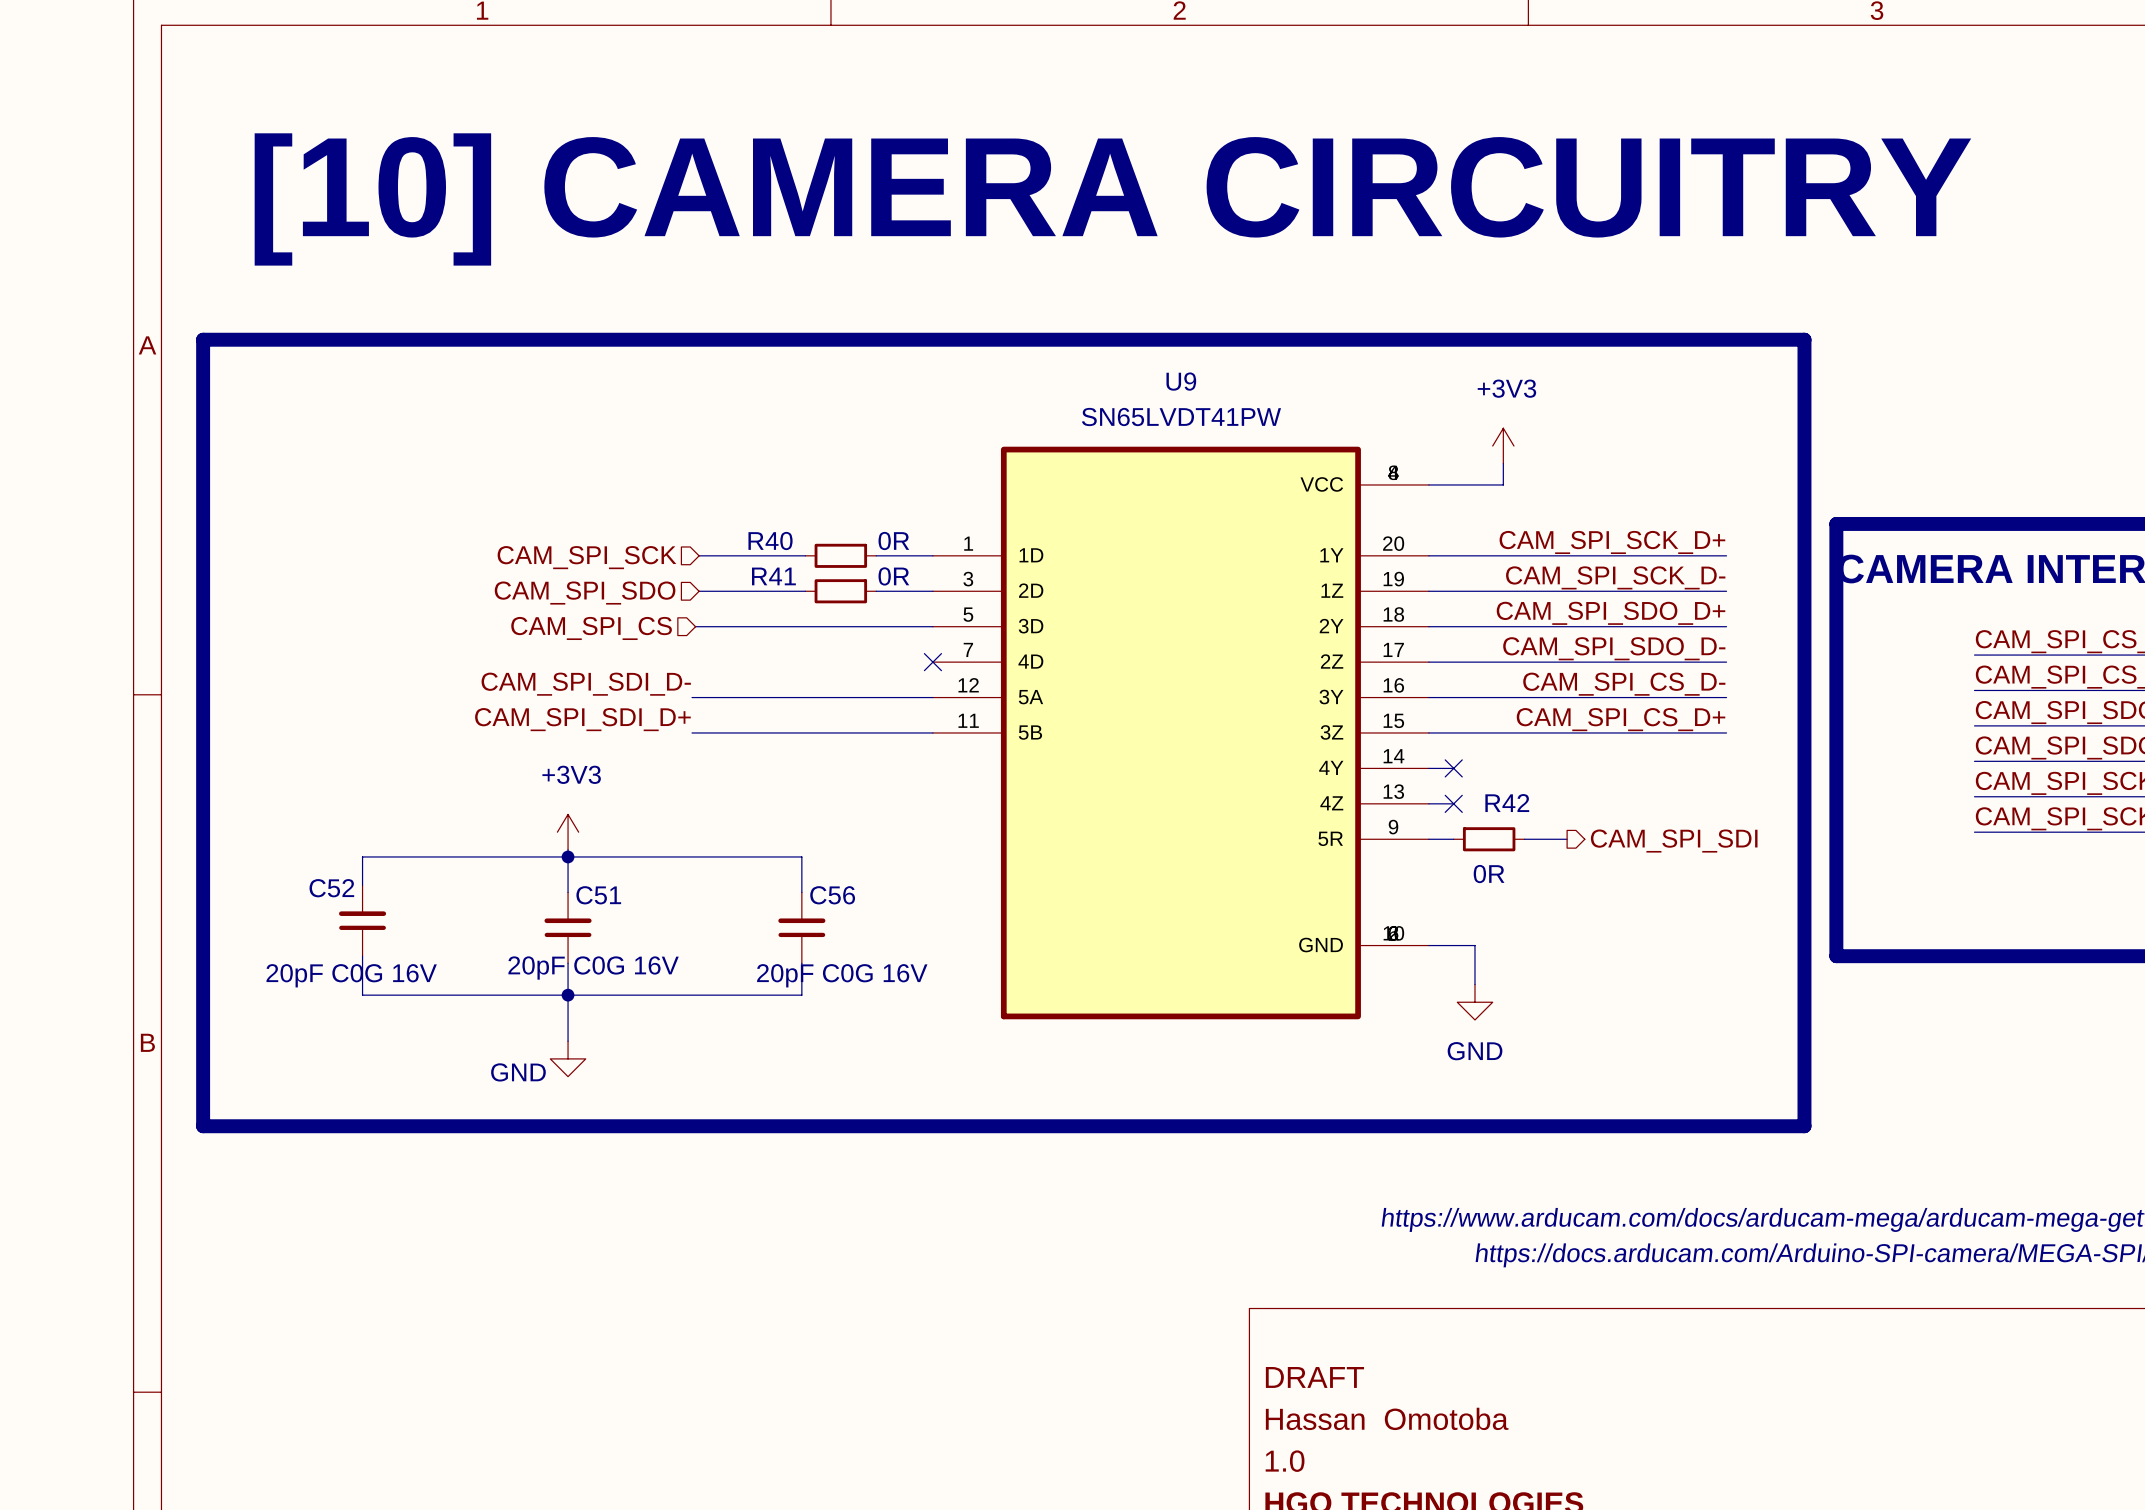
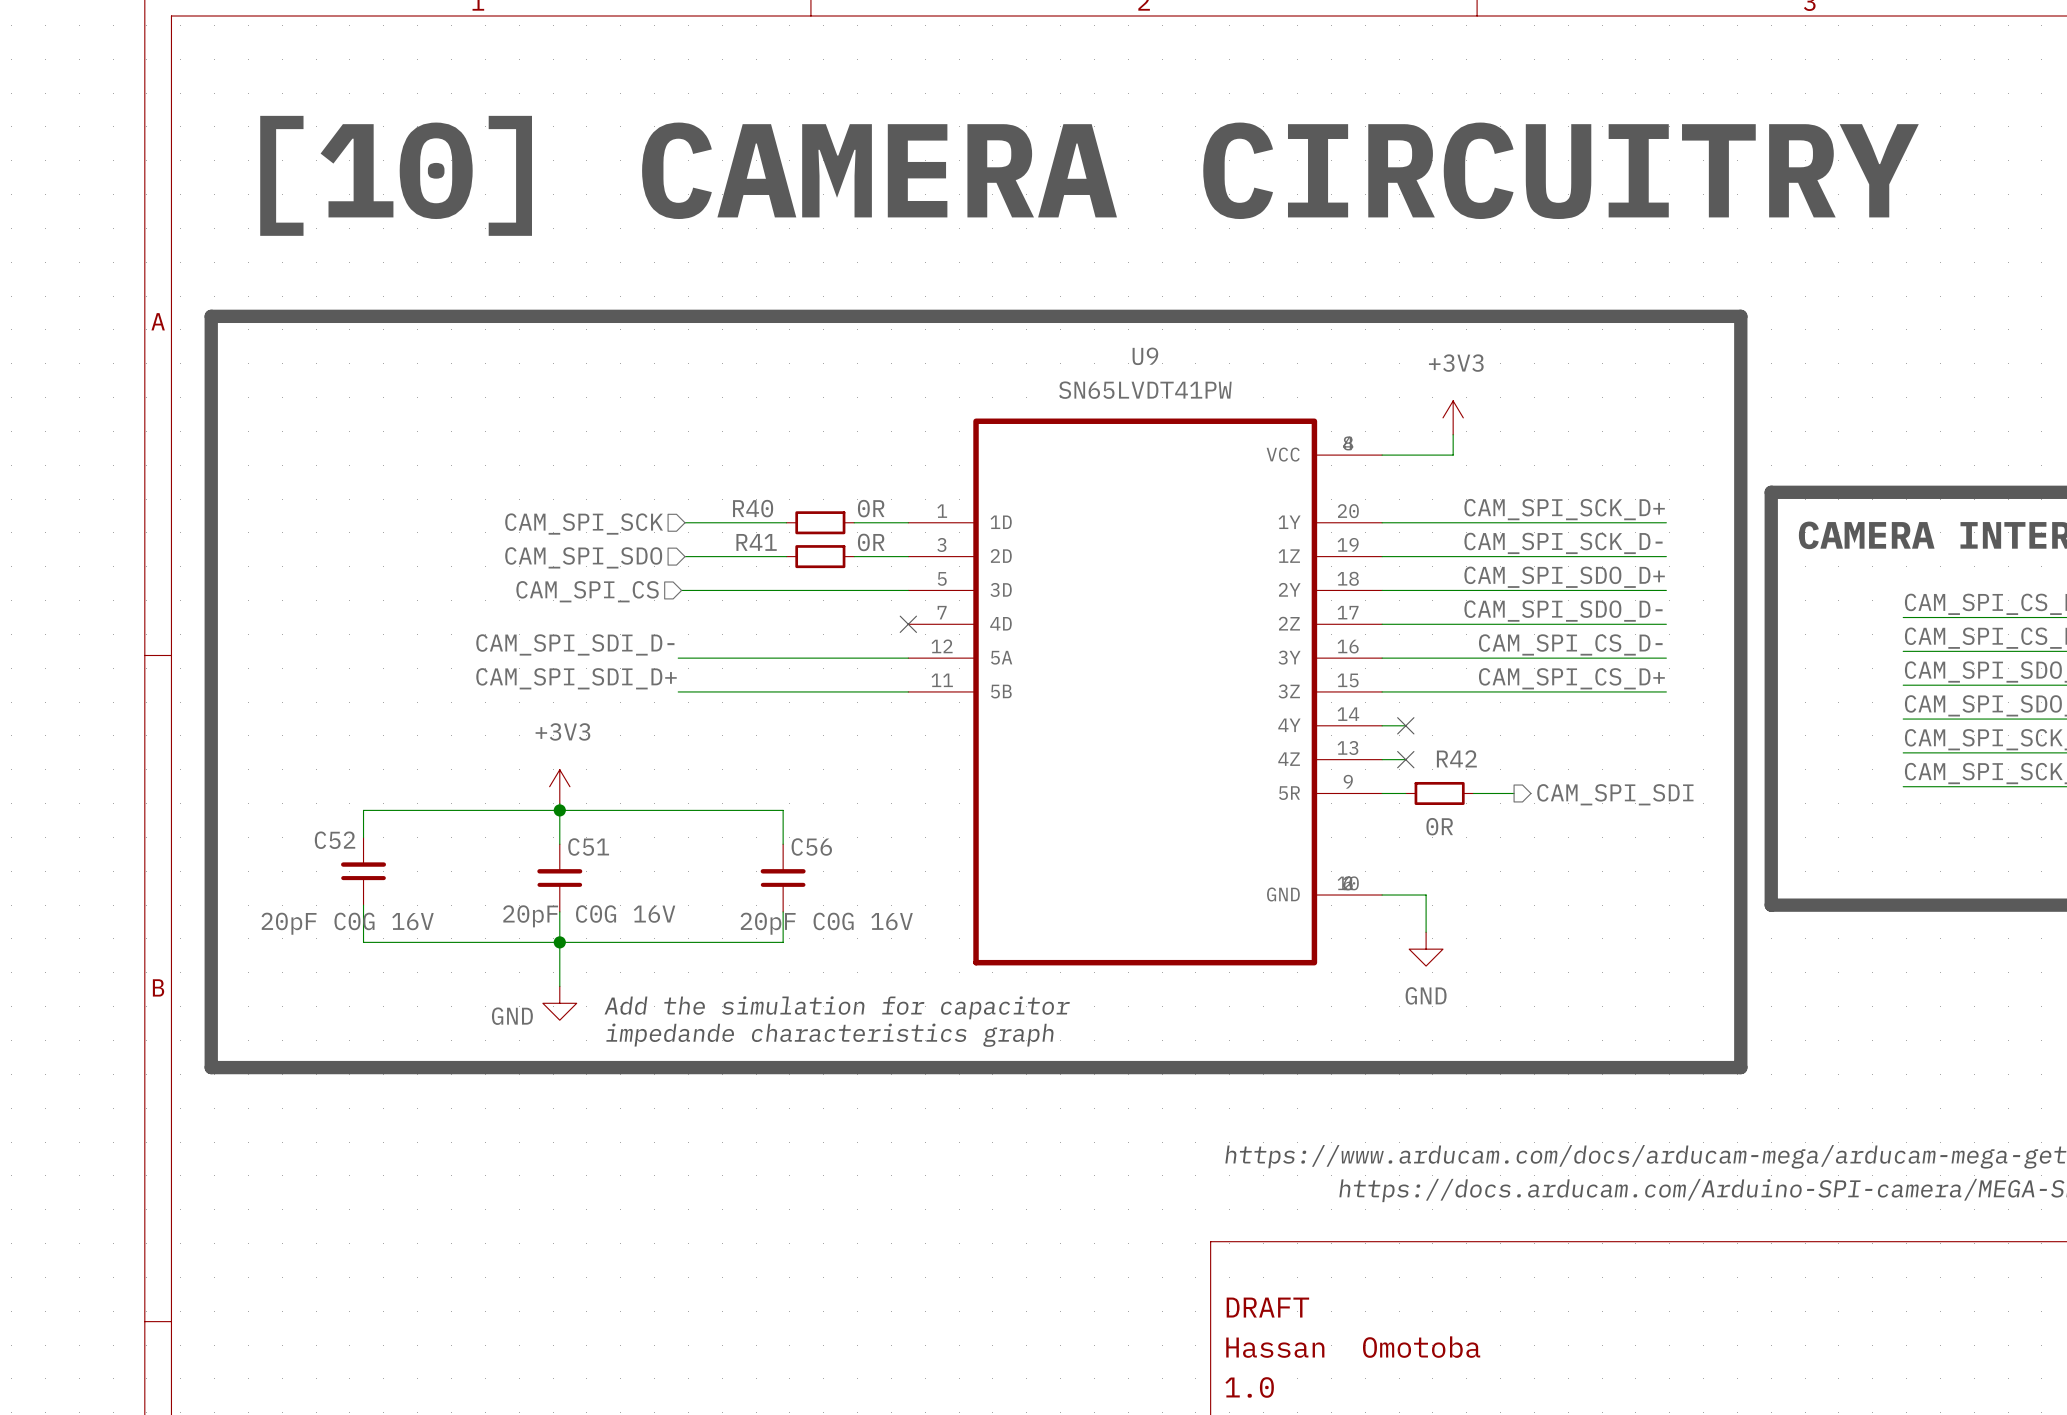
text: none -> Add the simulation for capacitor (837, 1007)
text: none -> impedande characteristics graph (830, 1035)

